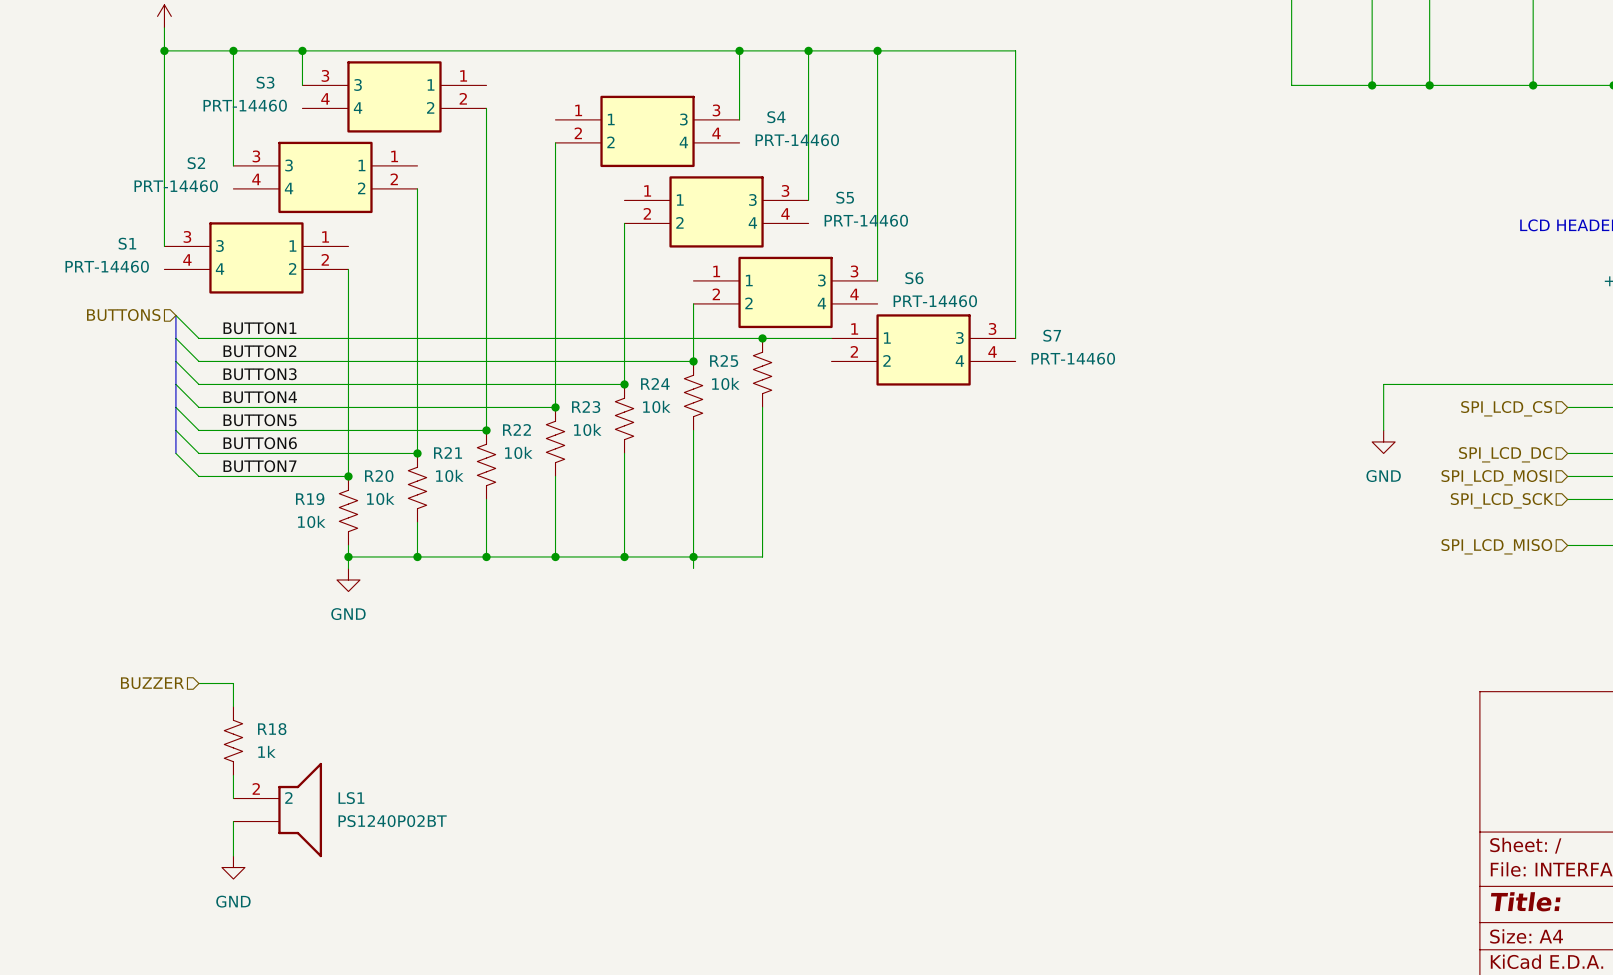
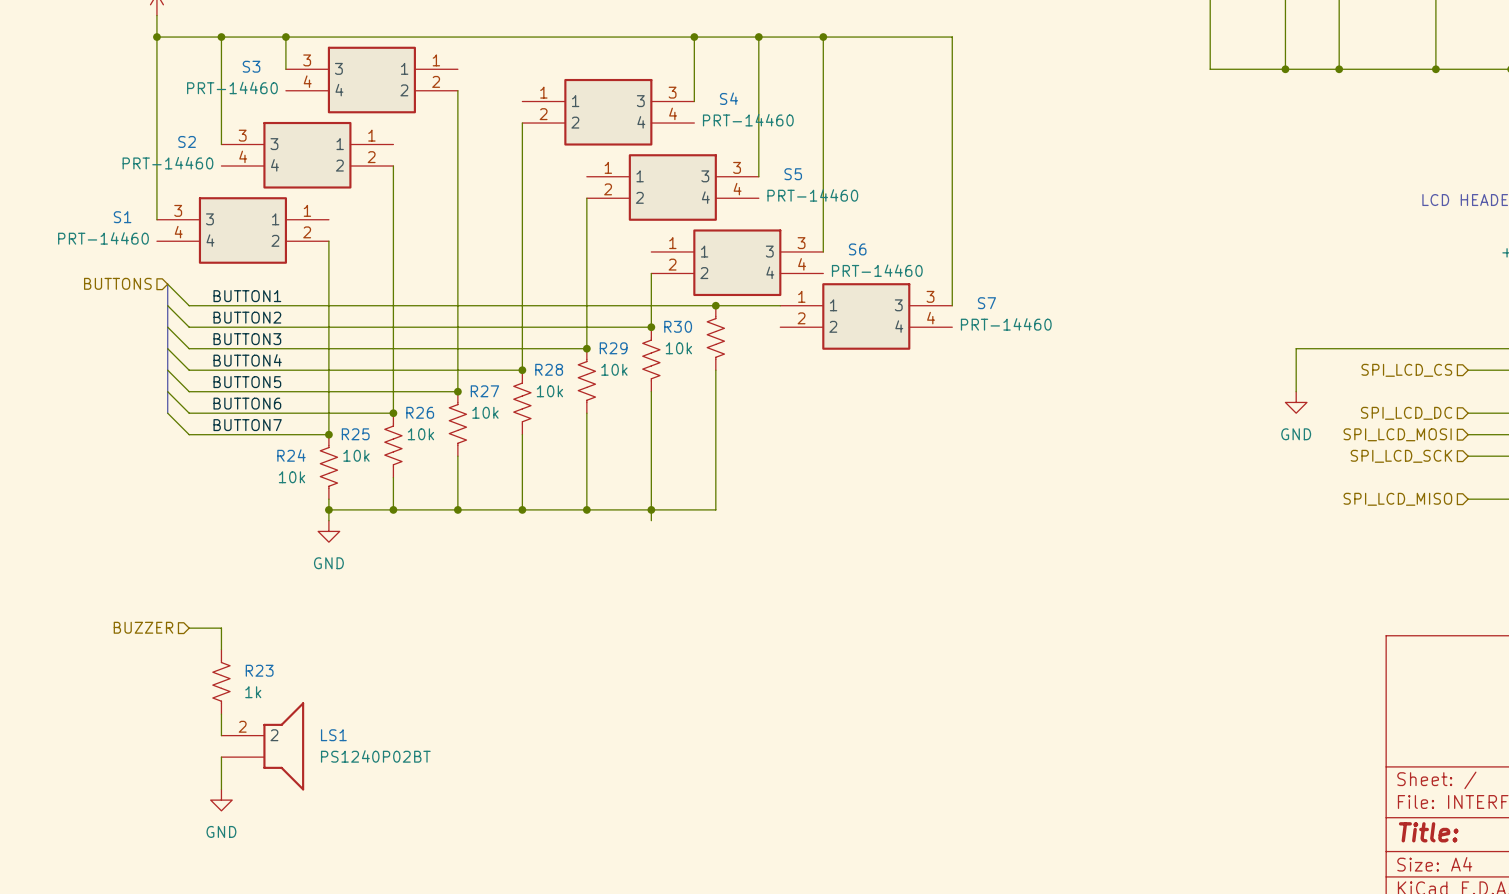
R25 name: R25 (724, 361) -> R30 (678, 326)
R24 name: R24 (655, 383) -> R29 (613, 348)
R23 name: R23 (586, 407) -> R28 (549, 369)
R22 name: R22 (516, 429) -> R27 (484, 391)
R21 name: R21 (448, 452) -> R26 (420, 412)
R20 name: R20 (379, 476) -> R25 (355, 434)
R19 name: R19 (310, 499) -> R24 (291, 455)
R18 name: R18 (272, 729) -> R23 (259, 670)

